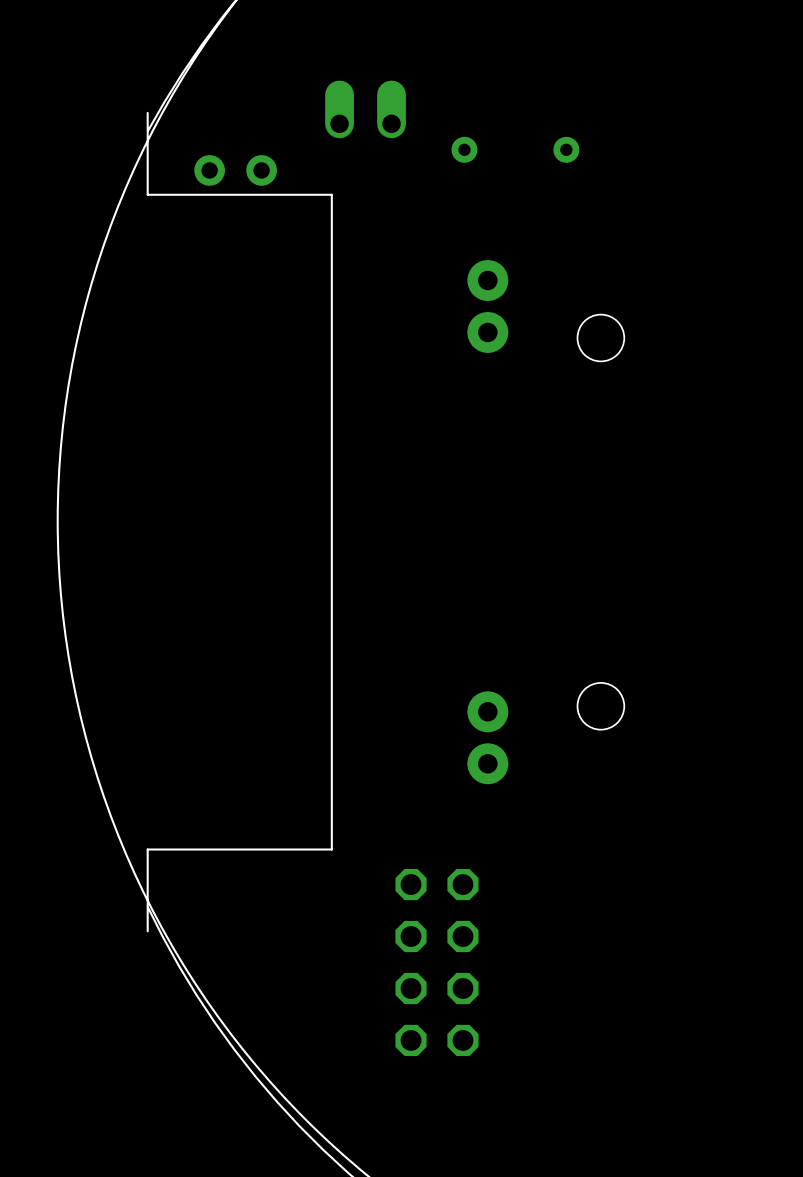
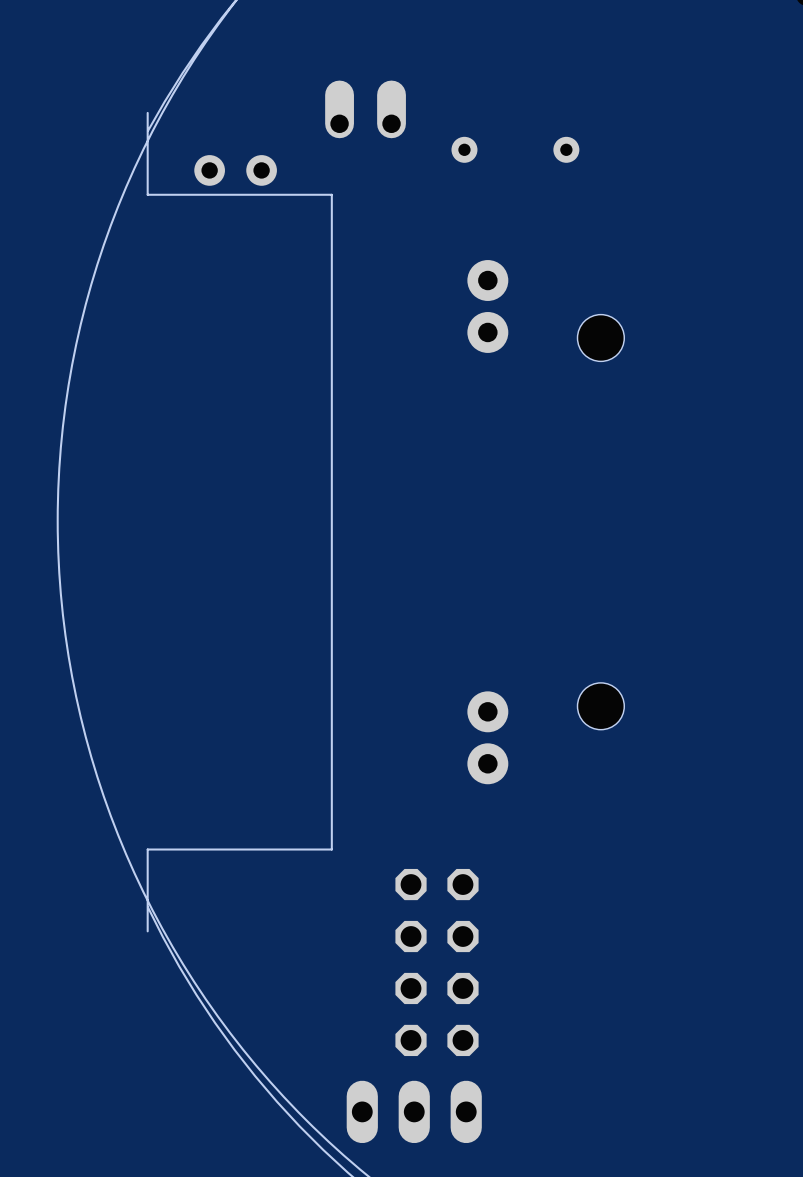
part: none -> (414, 1111)

